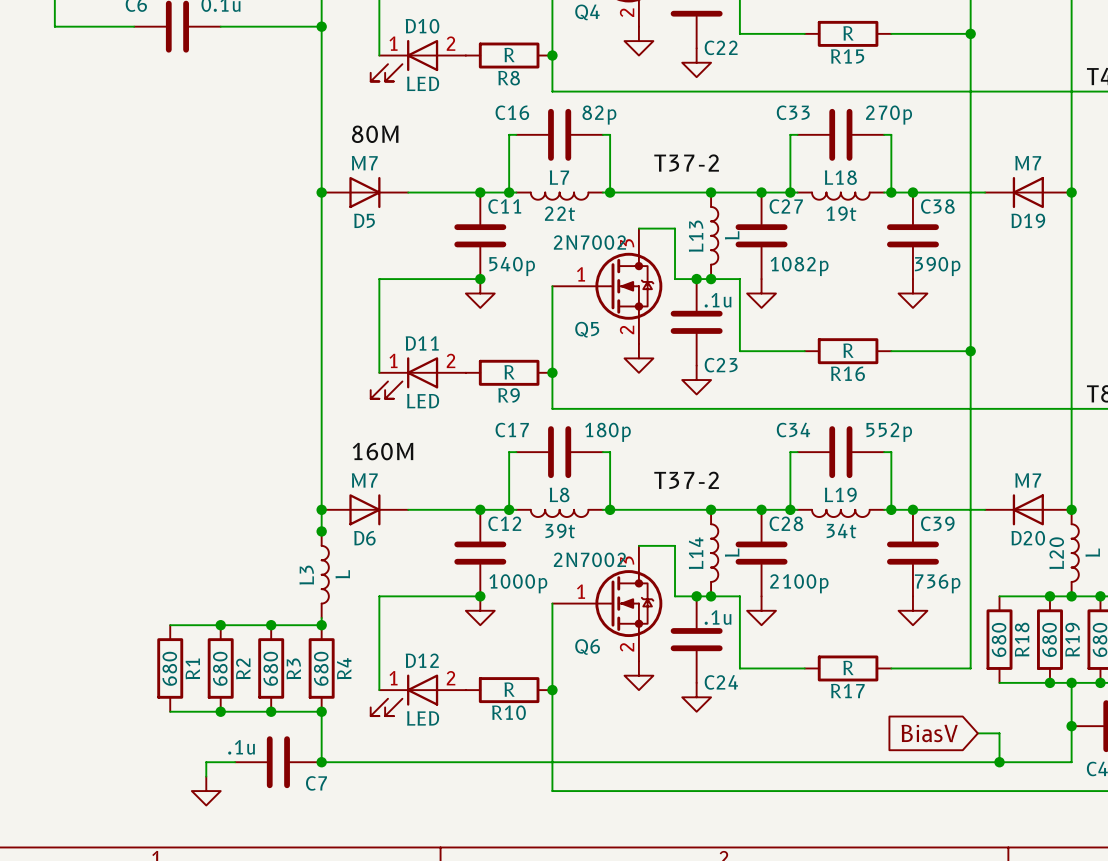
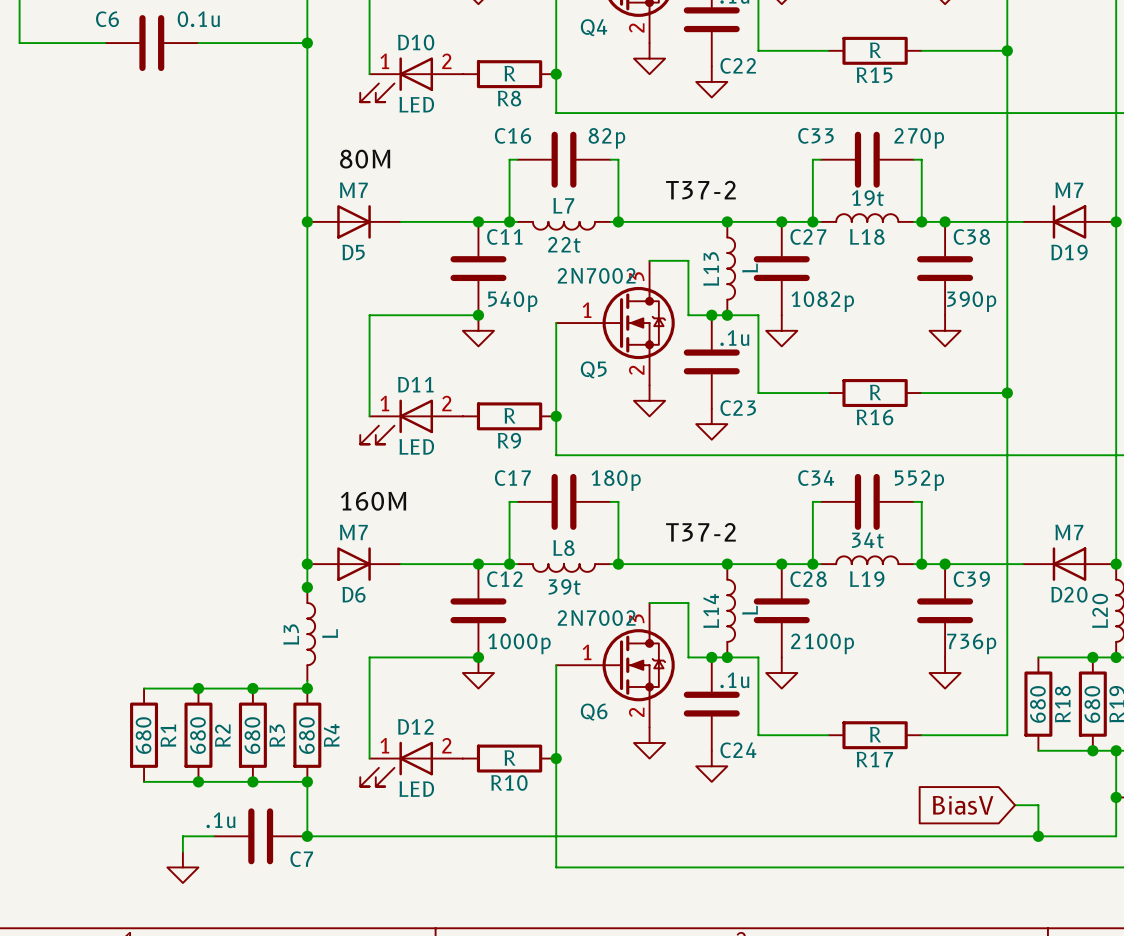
L18 rotation: 0° (840, 196) -> 180° (867, 218)
L19 rotation: 0° (840, 513) -> 180° (867, 560)

